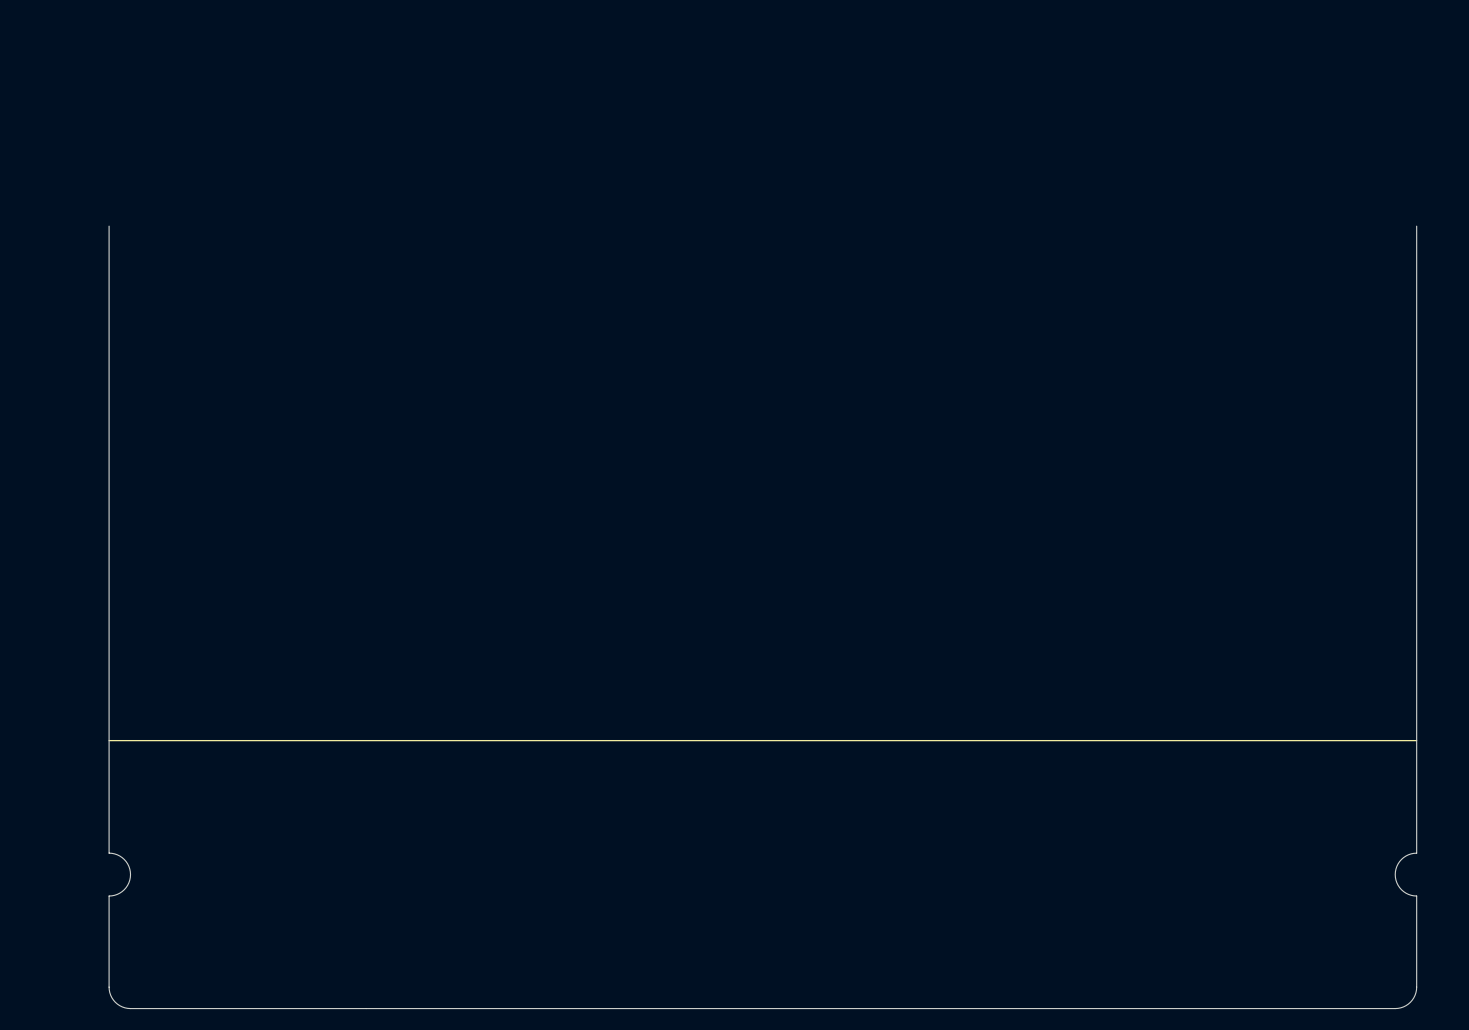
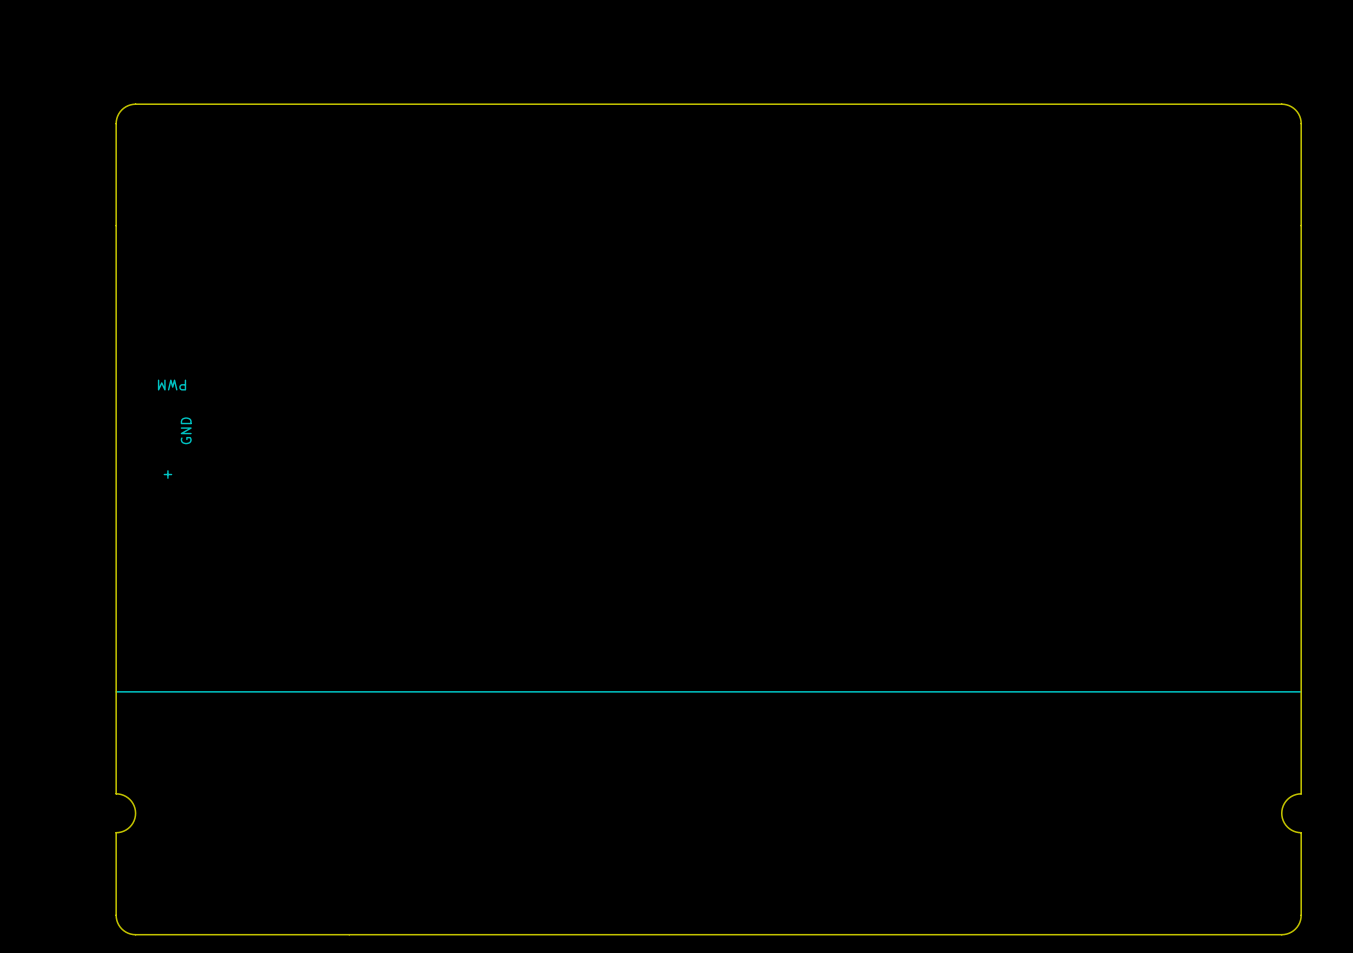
board edge: none -> (116, 225) (116, 121) (121, 109) (135, 104) (1284, 104) (1295, 109) (1301, 121) (1301, 225)
text: none -> PWM (172, 385)
text: none -> GND (186, 430)
text: none -> + (167, 474)

